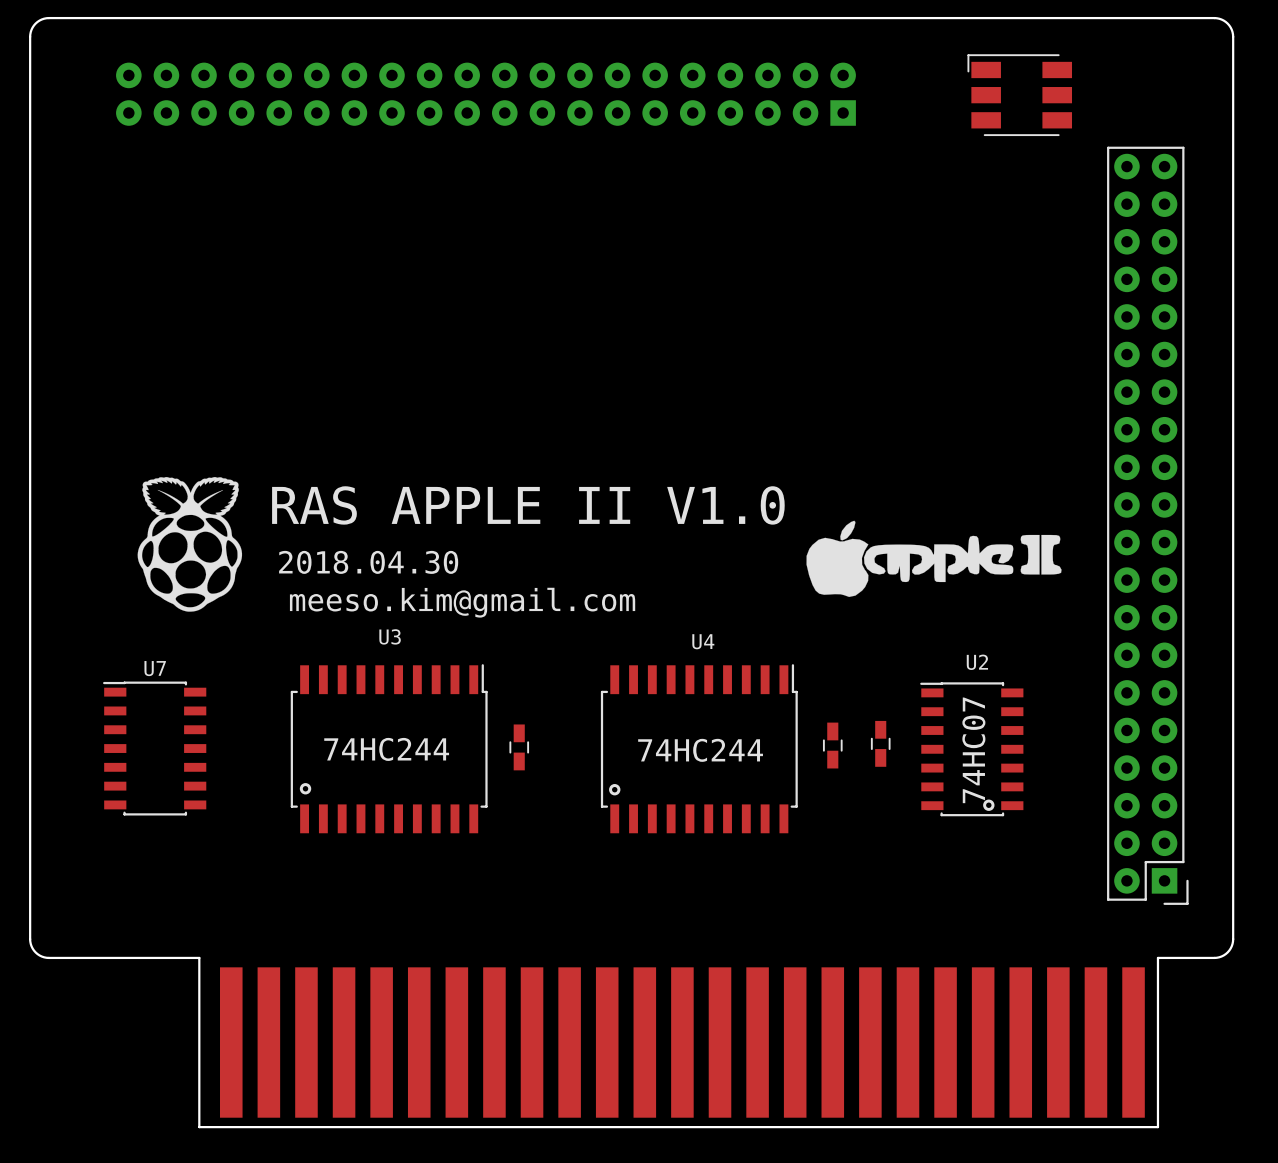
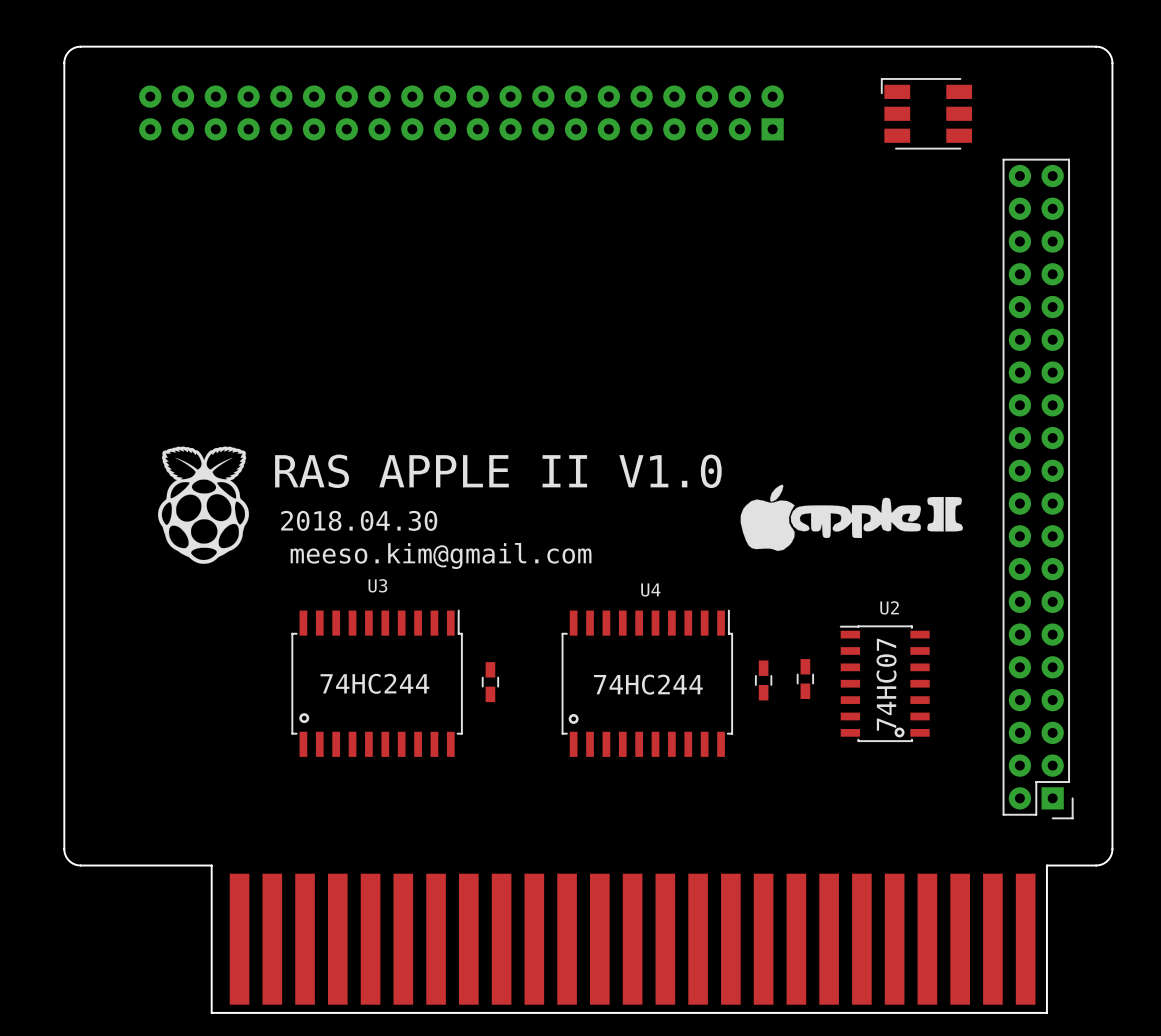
U7: (154, 748) -> none

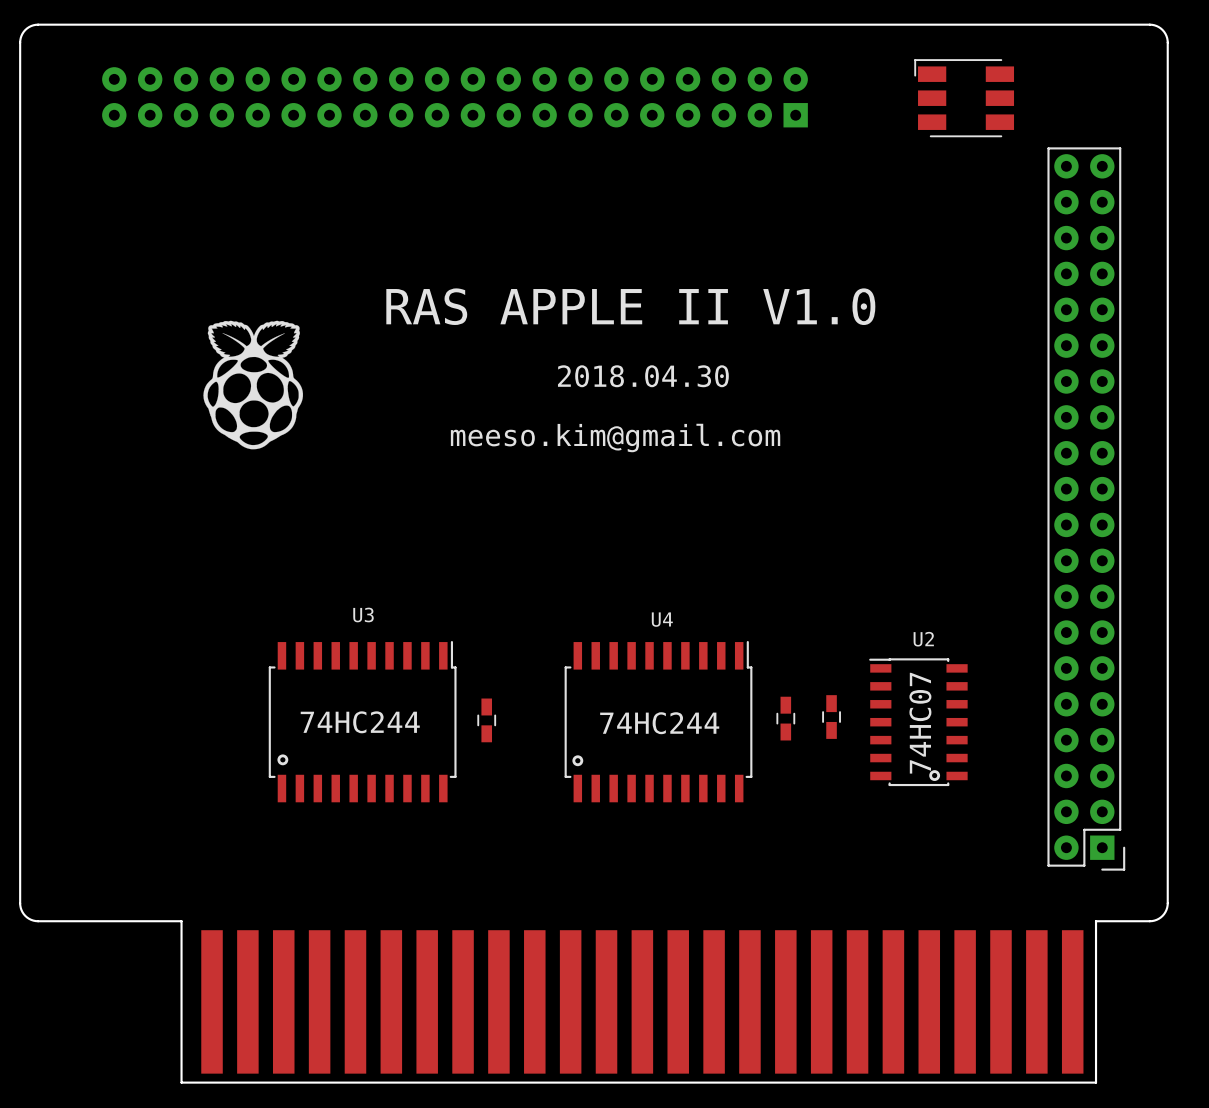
text position: RAS APPLE II V1.0 (498, 471) -> RAS APPLE II V1.0 (630, 306)
drawing: [740, 484, 963, 552] -> none
drawing position: (203, 505) -> (253, 385)
text position: 2018.04.30 (359, 520) -> 2018.04.30 (643, 376)
text position: meeso.kim@gmail.com (441, 555) -> meeso.kim@gmail.com (615, 437)

